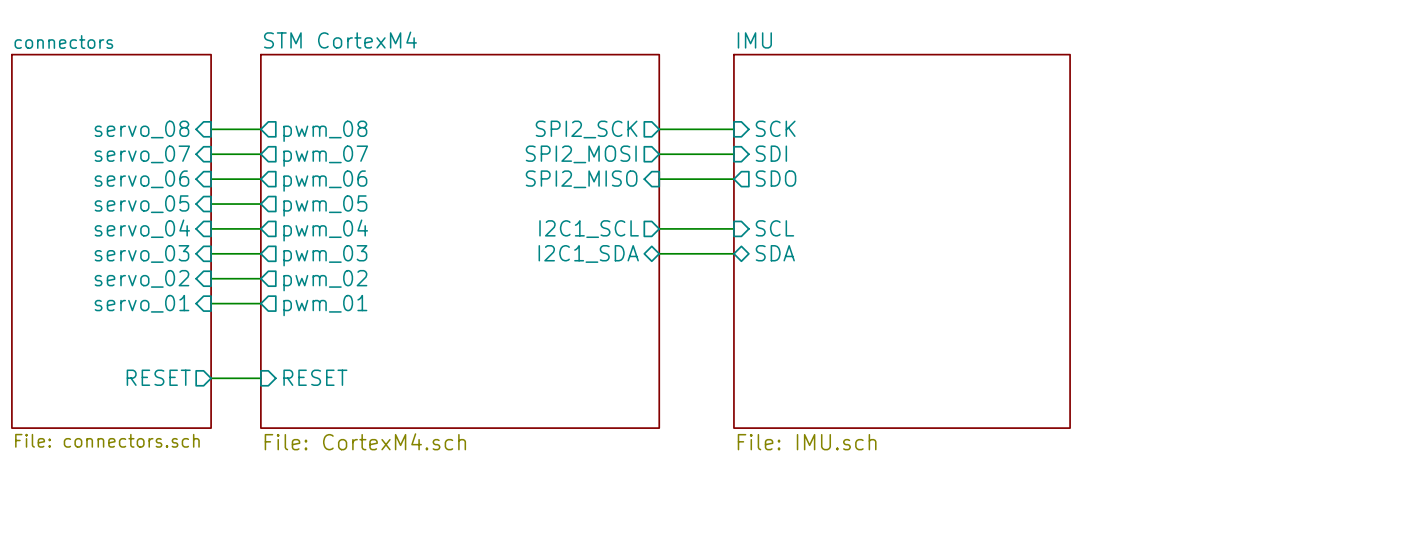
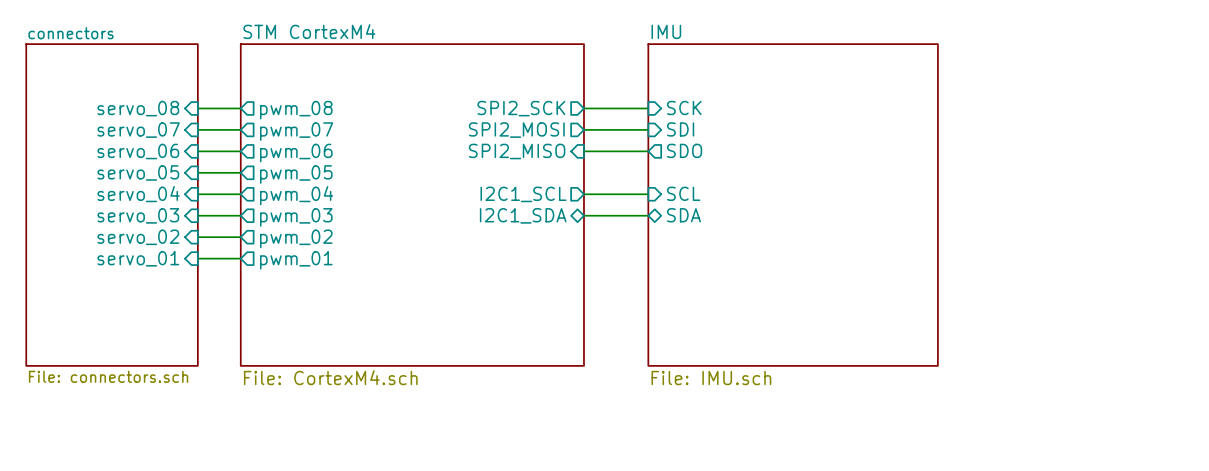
sheet pin: RESET (158, 377) -> none
sheet pin: RESET (315, 377) -> none
wire: (211, 378) (260, 378) -> none

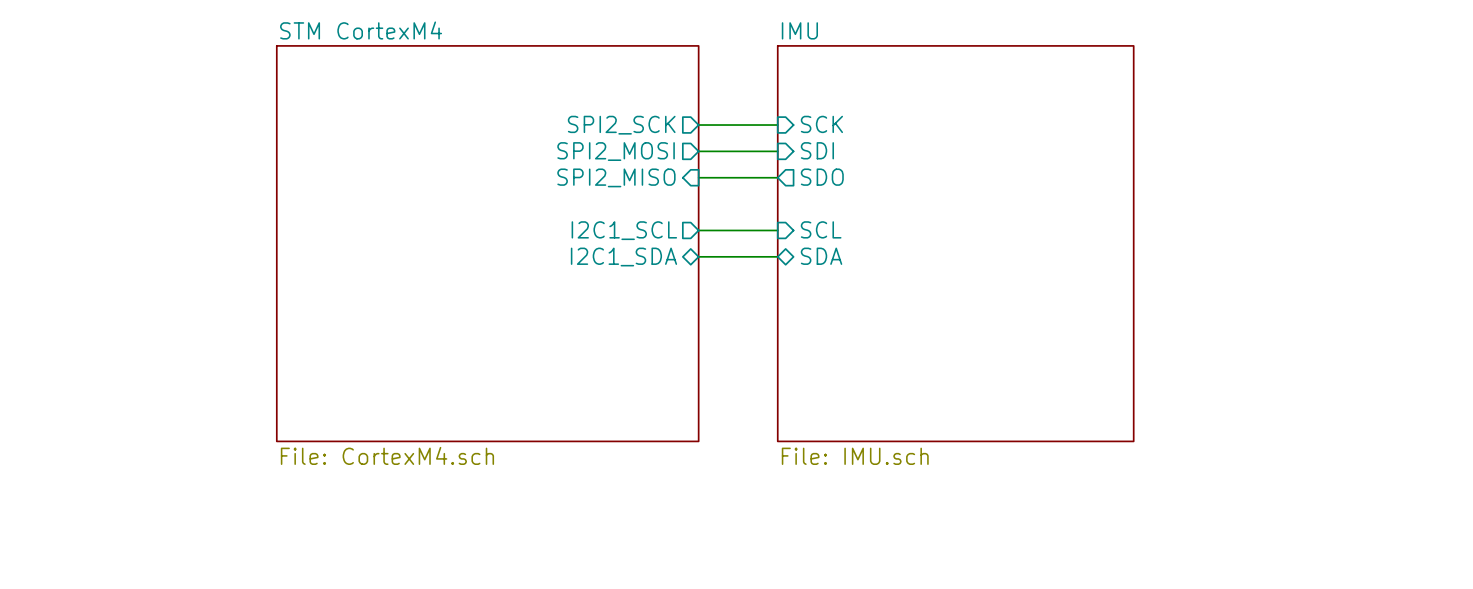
sheet pin: servo_08 (138, 108) -> none
wire: (197, 108) (240, 108) -> none
sheet pin: pwm_08 (296, 110) -> none
wire: (197, 129) (240, 129) -> none
sheet pin: servo_07 (138, 130) -> none
sheet pin: pwm_07 (296, 131) -> none
sheet pin: servo_06 (138, 151) -> none
wire: (197, 151) (240, 151) -> none
sheet pin: pwm_06 (296, 153) -> none
sheet pin: servo_05 (138, 172) -> none
wire: (197, 172) (240, 172) -> none
sheet pin: pwm_05 (296, 174) -> none
sheet pin: servo_04 (138, 194) -> none
wire: (197, 194) (240, 194) -> none
sheet pin: pwm_04 (296, 195) -> none
sheet connectors: File: connectors.sch (112, 205) -> none
sheet pin: servo_03 (138, 215) -> none
wire: (197, 215) (240, 215) -> none
sheet pin: pwm_03 (296, 217) -> none
sheet pin: servo_02 (138, 237) -> none
wire: (197, 237) (240, 237) -> none
sheet pin: pwm_02 (296, 238) -> none
sheet pin: servo_01 (138, 258) -> none
wire: (197, 258) (240, 258) -> none
sheet pin: pwm_01 (296, 260) -> none

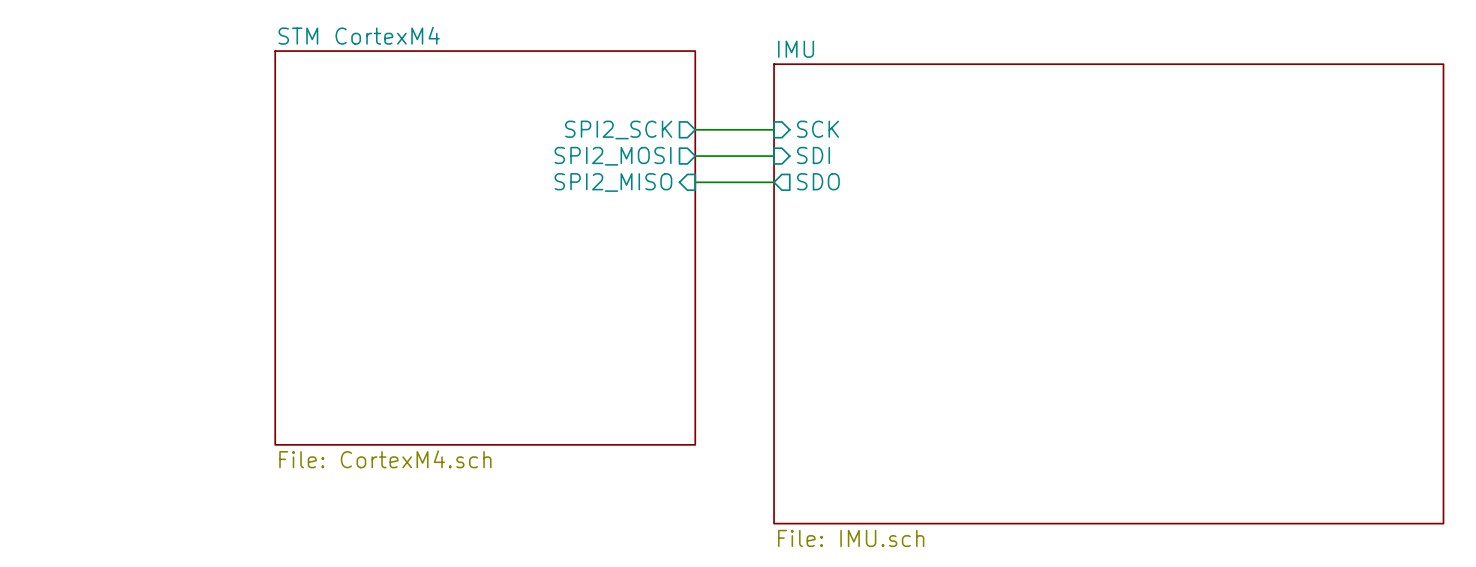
sheet pin: SCL (821, 229) -> none
sheet pin: I2C1_SCL (624, 230) -> none
wire: (698, 230) (777, 230) -> none
sheet IMU: File: IMU.sch (955, 243) -> none
wire: (698, 256) (777, 256) -> none
sheet pin: SDA (821, 256) -> none
sheet pin: I2C1_SDA (623, 257) -> none
sheet IMU: none -> File: IMU.sch (1108, 293)

